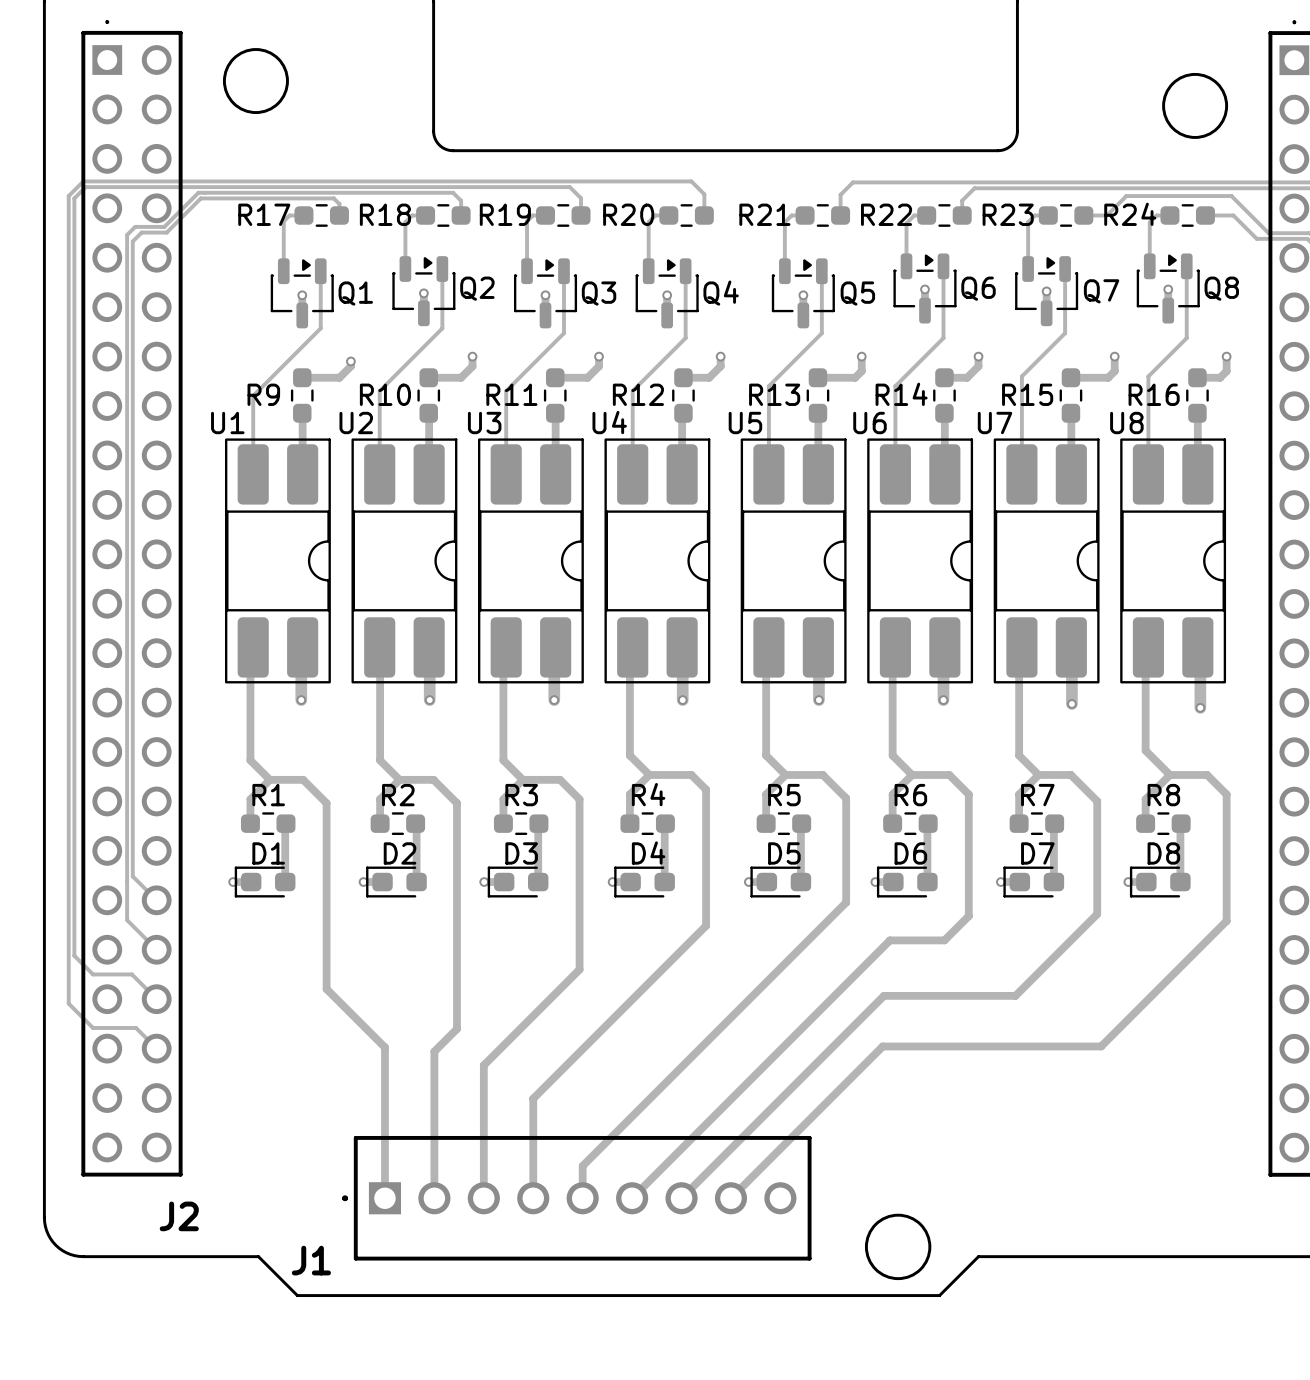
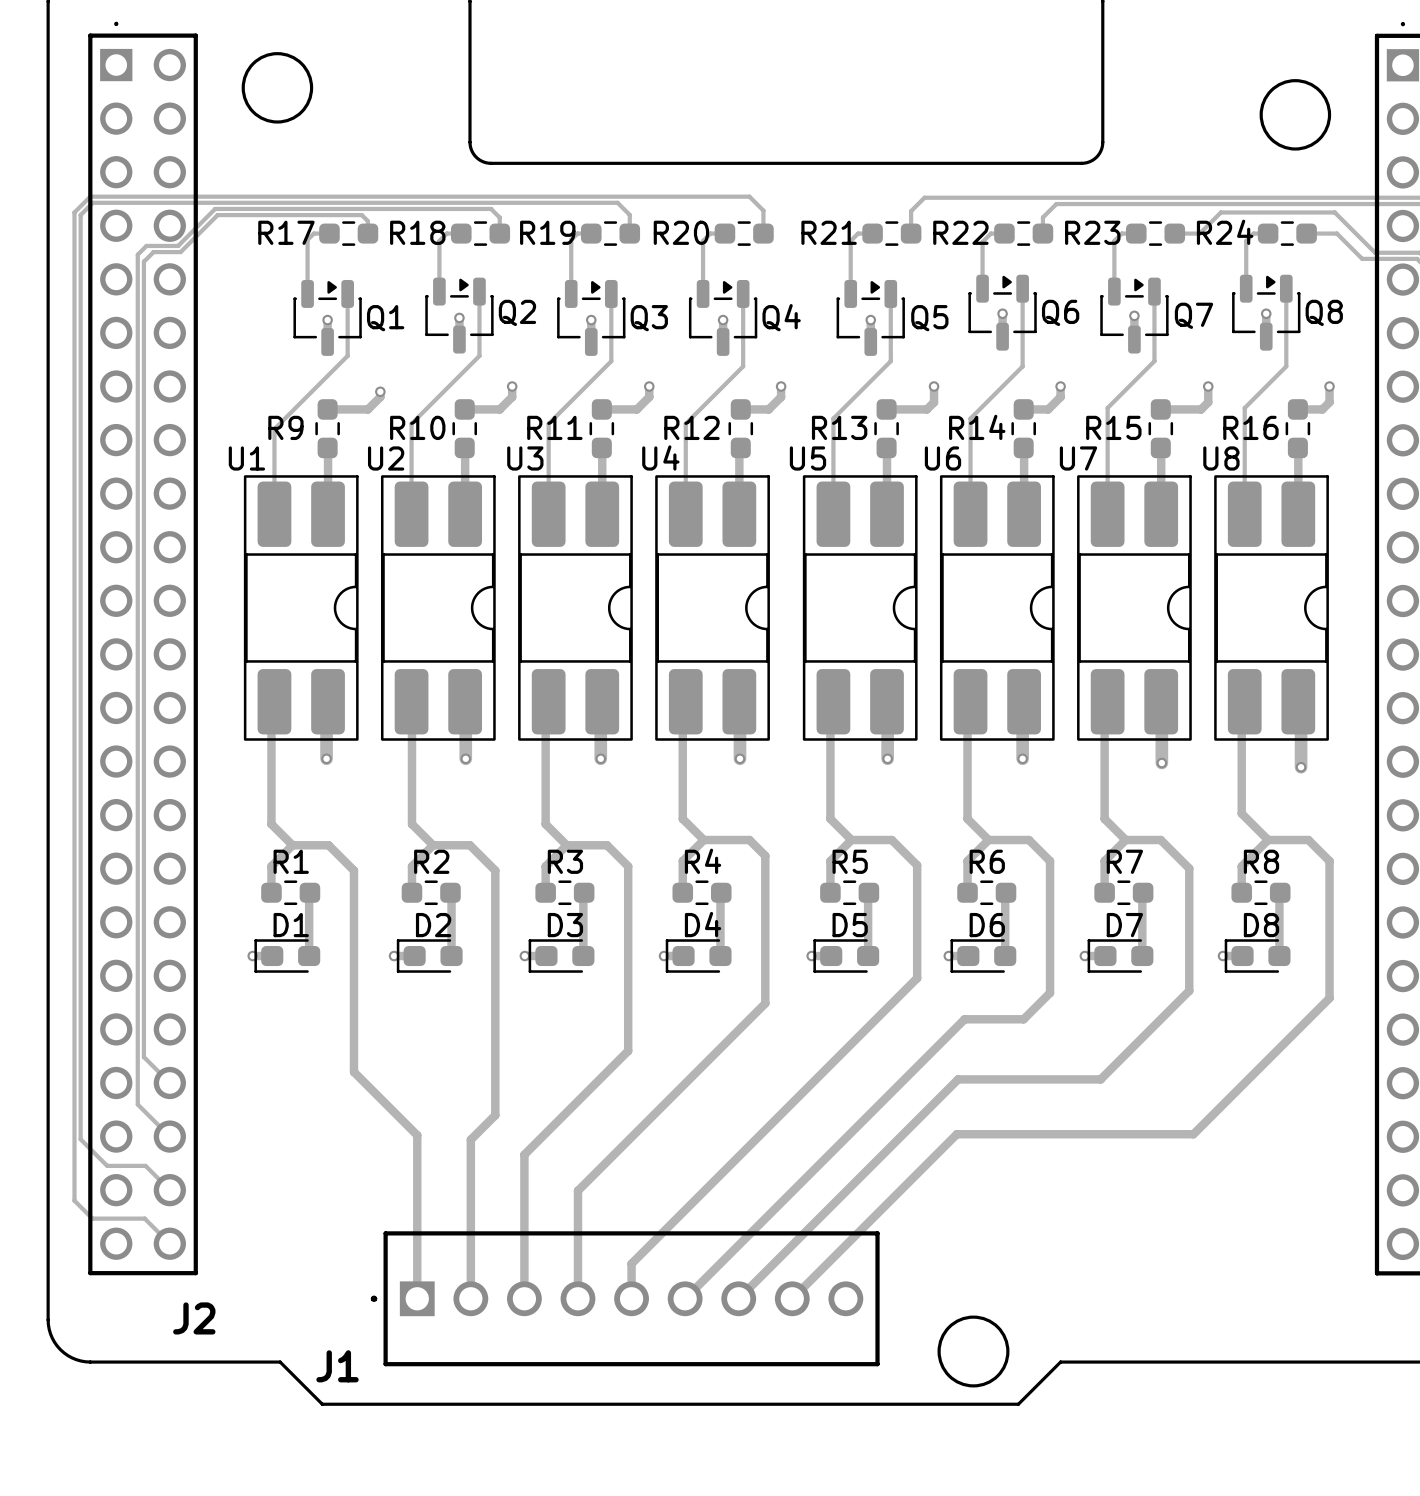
track: (132, 876) (156, 900) -> (143, 949) (143, 1057)
track: (127, 920) (156, 949) -> (137, 997) (137, 1104) (147, 1114)
track: (74, 955) (93, 974) (132, 975) -> (80, 1035) (80, 1139) (107, 1165) (145, 1165) (169, 1190)
track: (68, 1003) (93, 1027) (136, 1027) -> (74, 1087) (74, 1200) (92, 1218) (144, 1218) (169, 1243)

